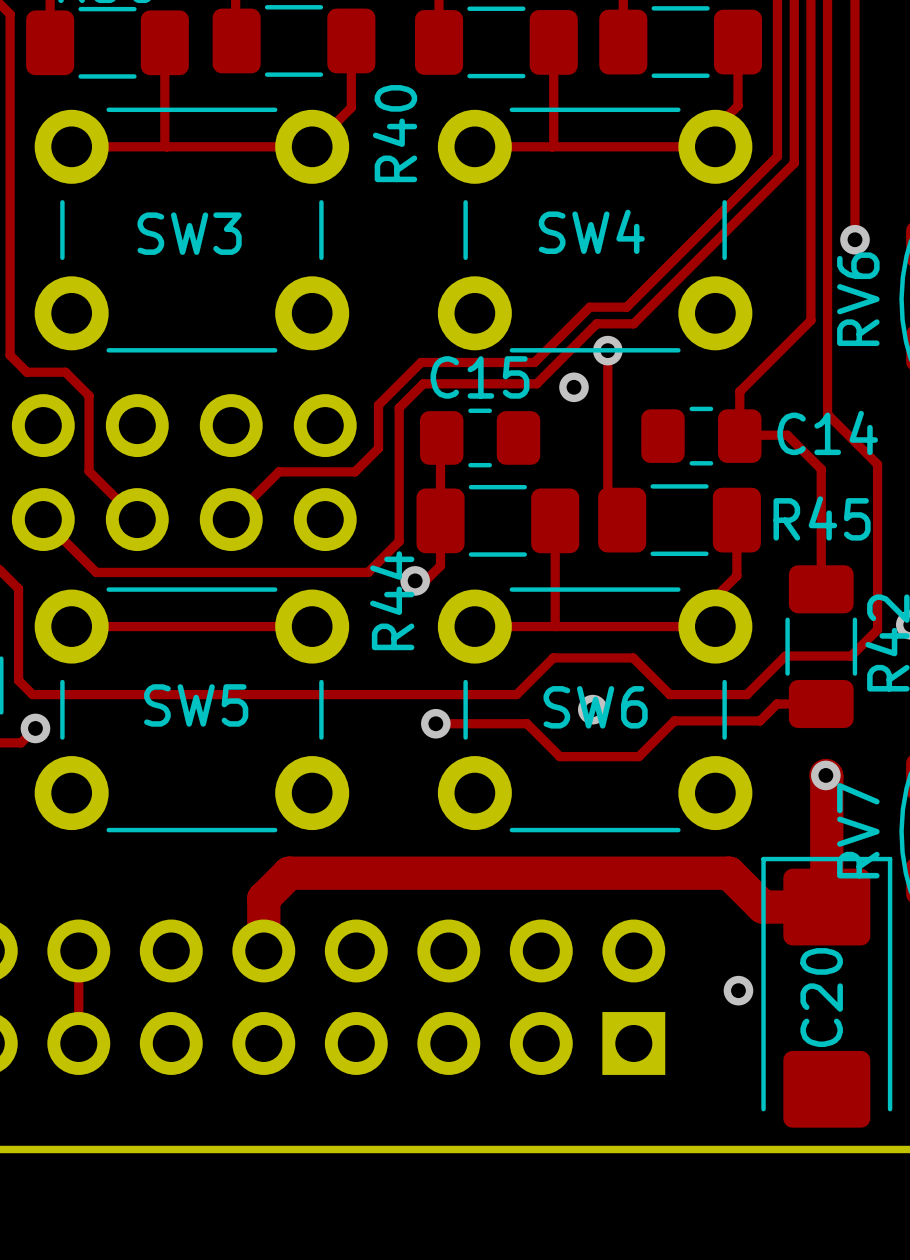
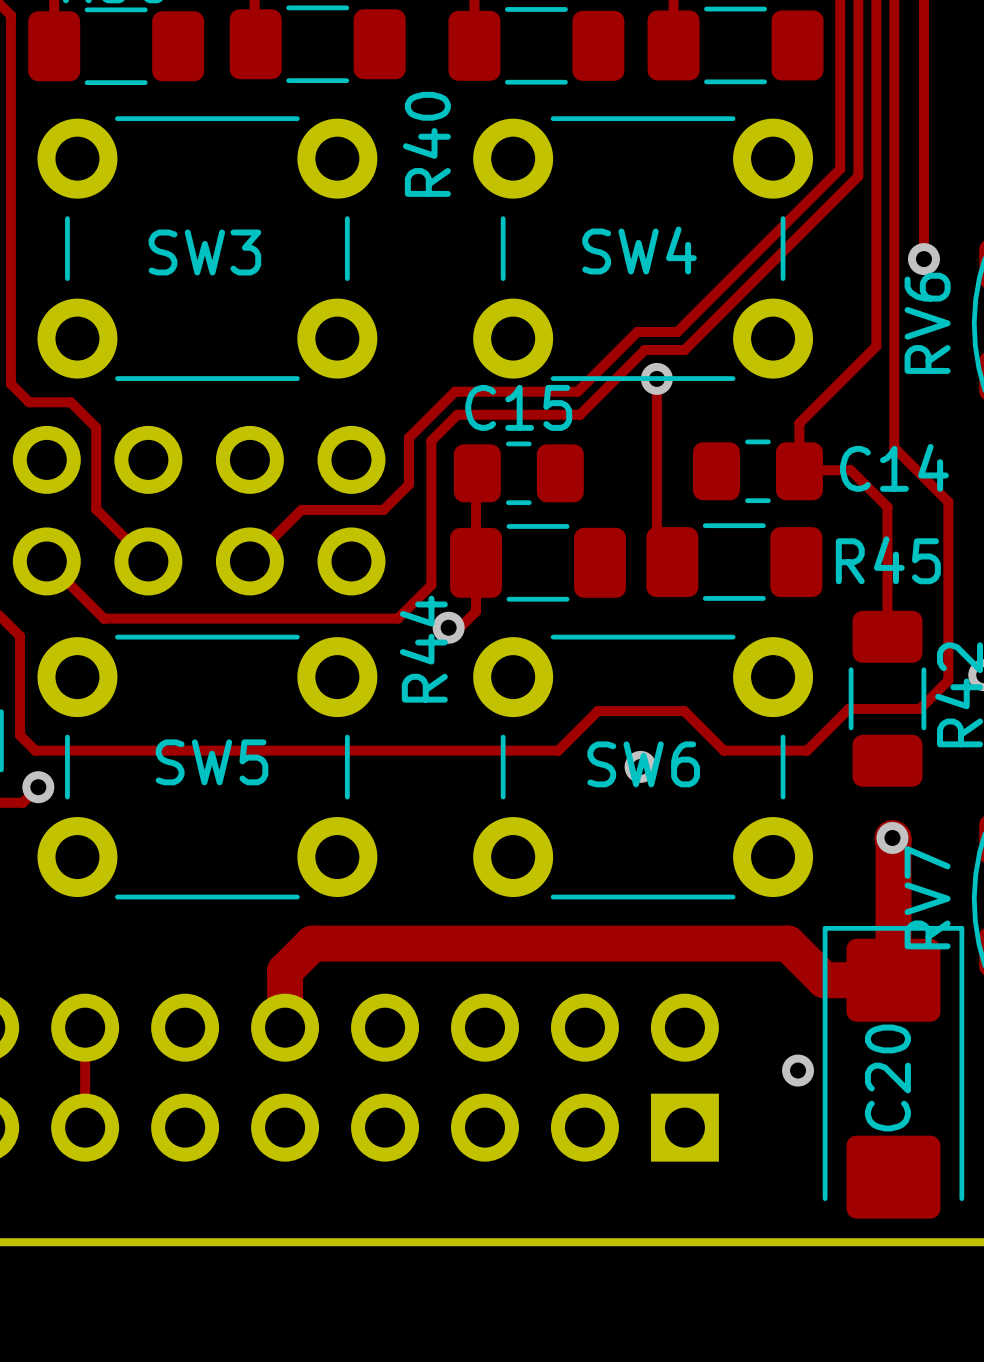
track: (351, 40) (351, 107) (312, 146) (71, 146) -> none
track: (164, 42) (164, 144) (167, 146) -> none
track: (553, 42) (552, 146) -> none
track: (738, 42) (738, 105) (715, 128) (715, 146) (474, 146) -> none
via: (573, 387) -> none
track: (555, 520) (556, 626) -> none
track: (736, 520) (736, 575) (715, 597) (715, 626) (474, 626) -> none
track: (71, 626) (312, 626) -> none
track: (821, 704) (777, 704) (760, 720) (674, 720) (638, 756) (559, 756) (527, 723) (435, 723) -> none
via: (435, 723) -> none

